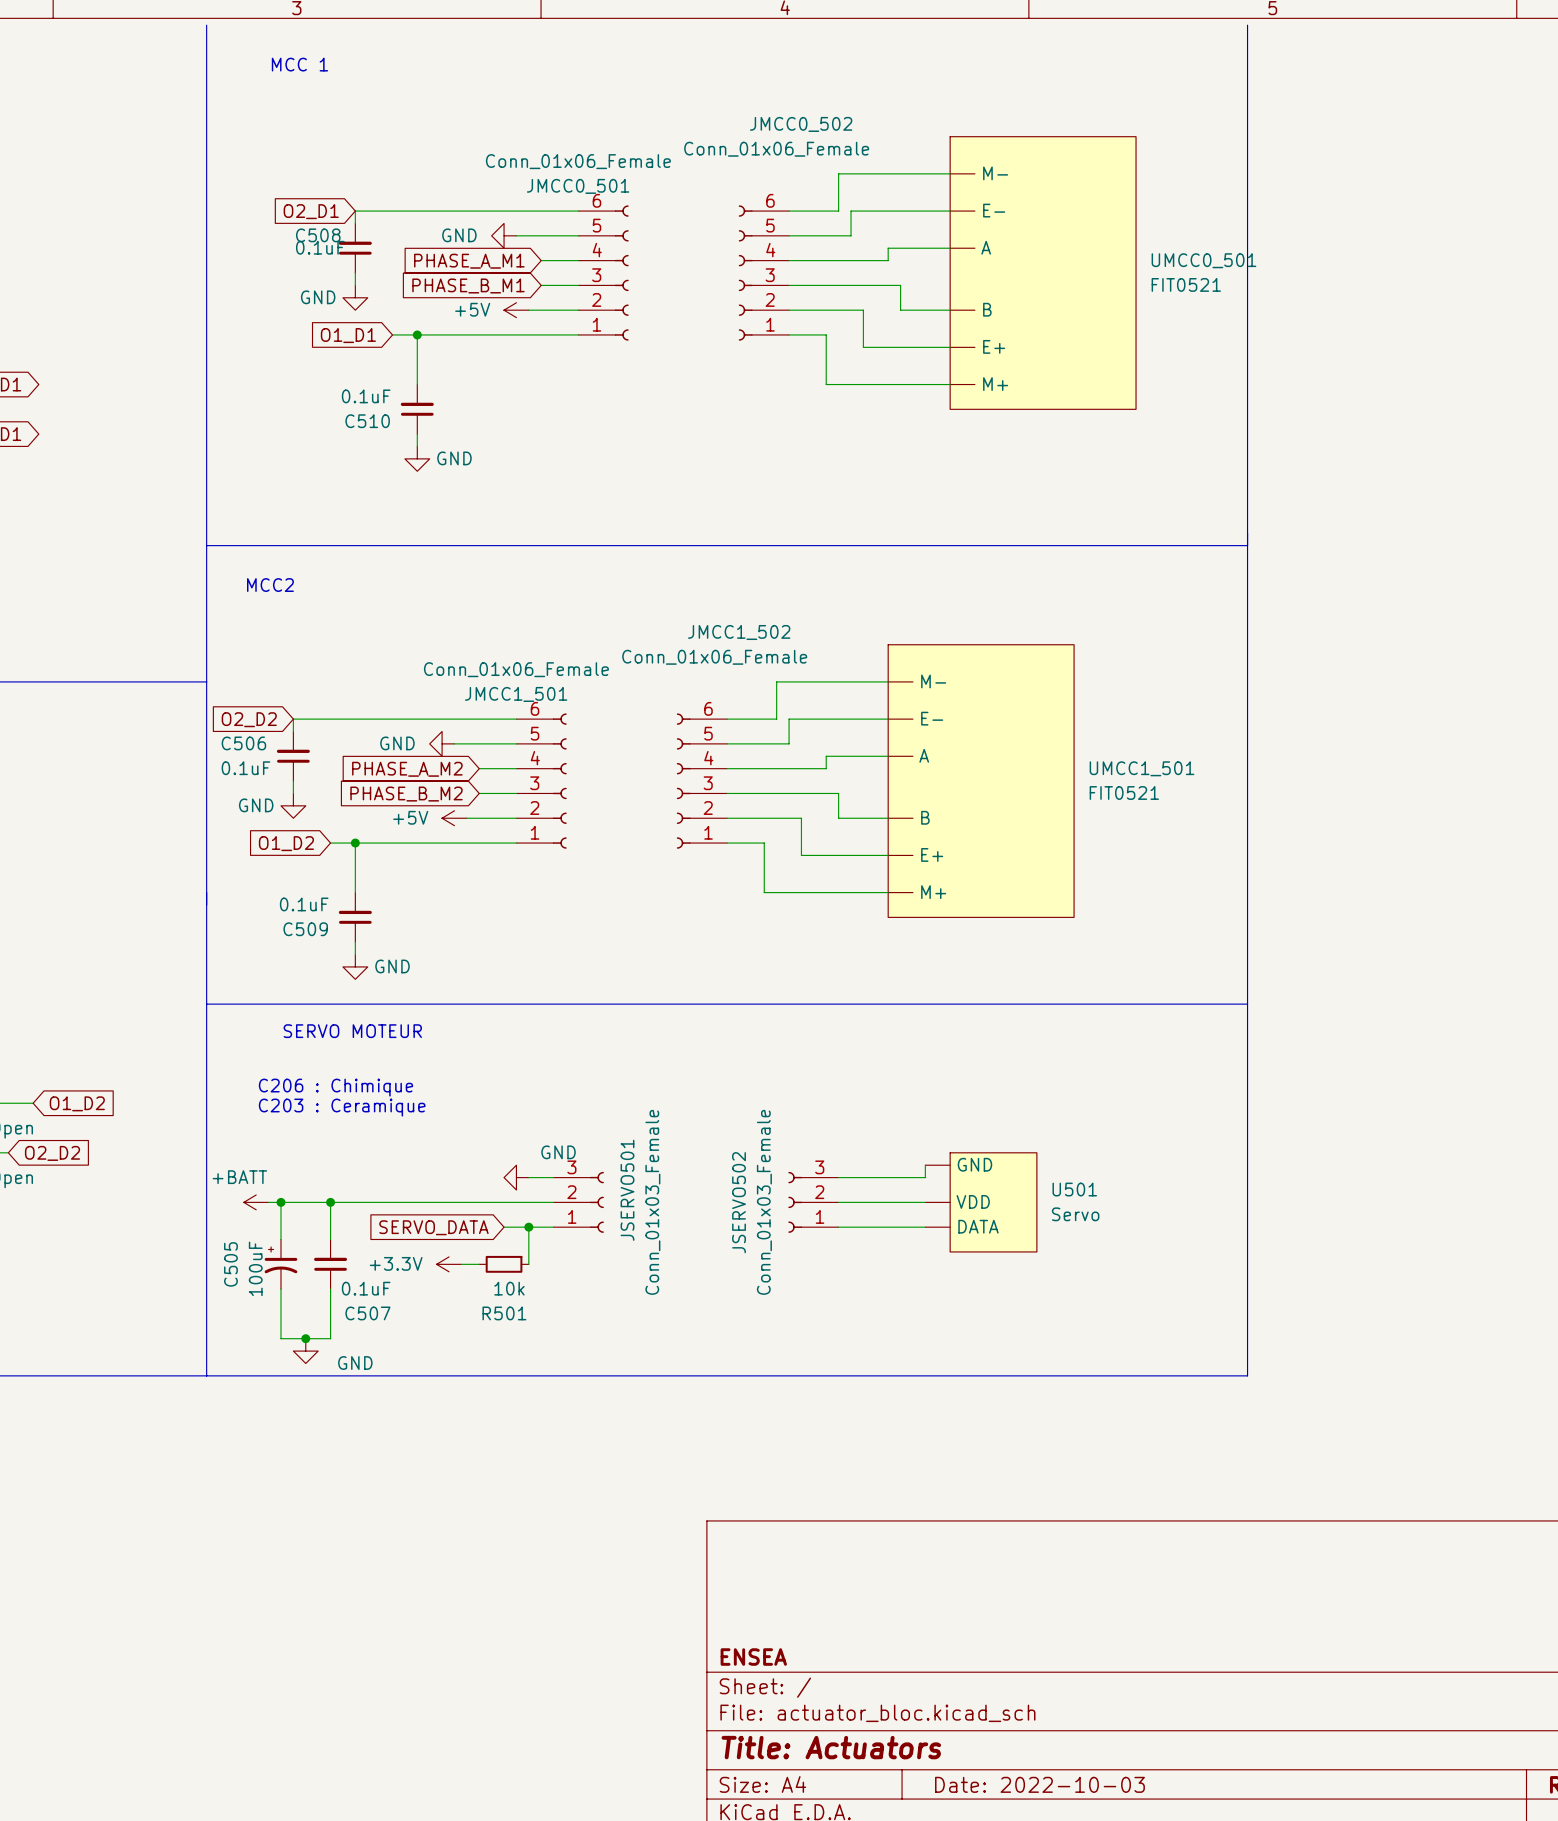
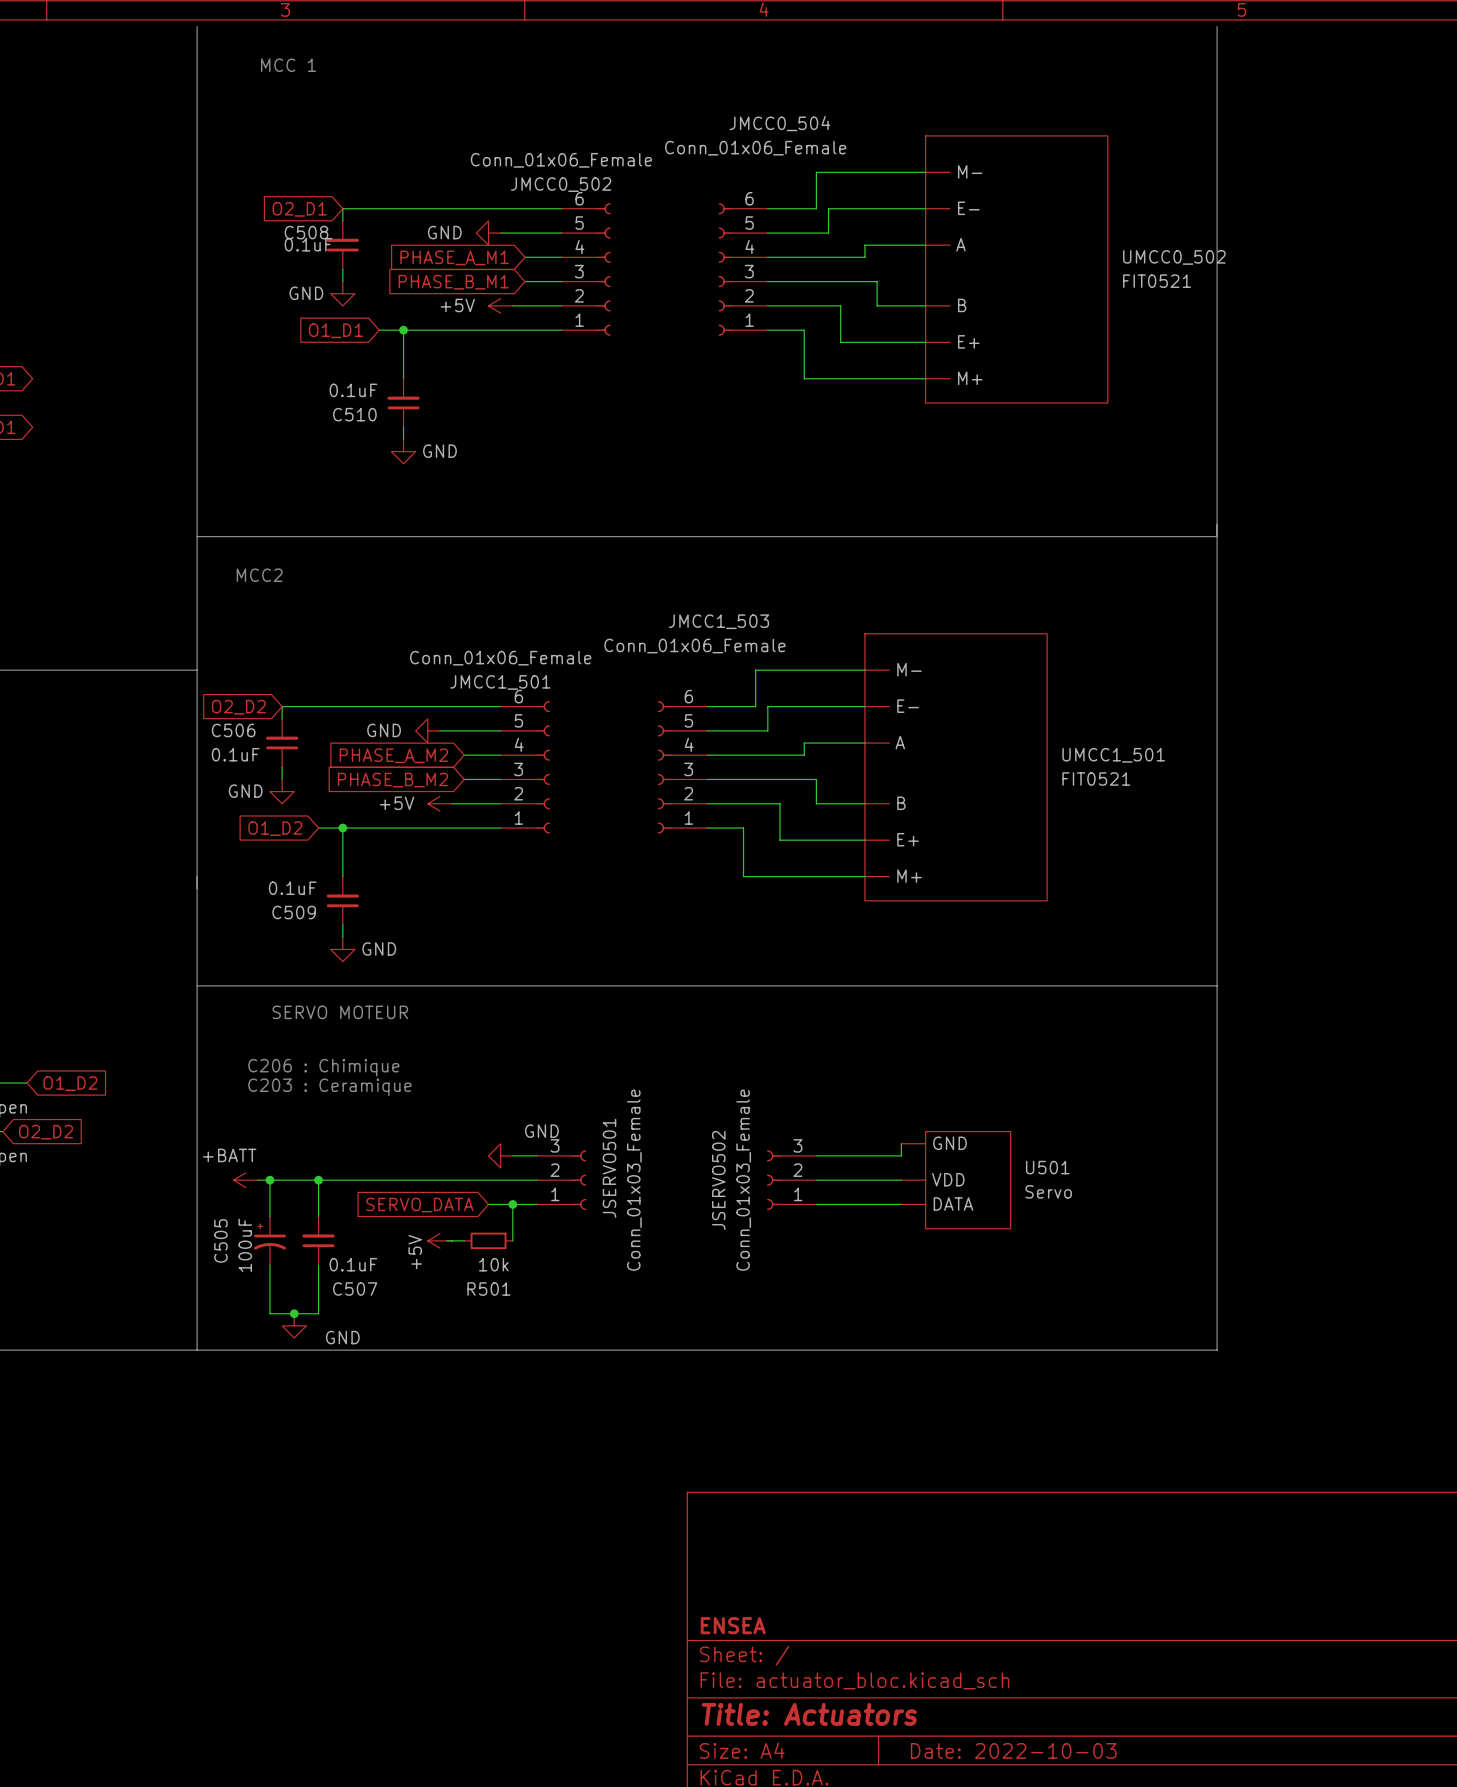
JMCC0_502 name: JMCC0_502 (801, 124) -> JMCC0_504 (779, 123)
JMCC0_501 name: JMCC0_501 (578, 186) -> JMCC0_502 (561, 184)
UMCC0_501 name: UMCC0_501 (1203, 260) -> UMCC0_502 (1174, 257)
JMCC1_502 name: JMCC1_502 (739, 632) -> JMCC1_503 (718, 621)
power symbol: +3.3V (449, 1264) -> +5V (439, 1240)

